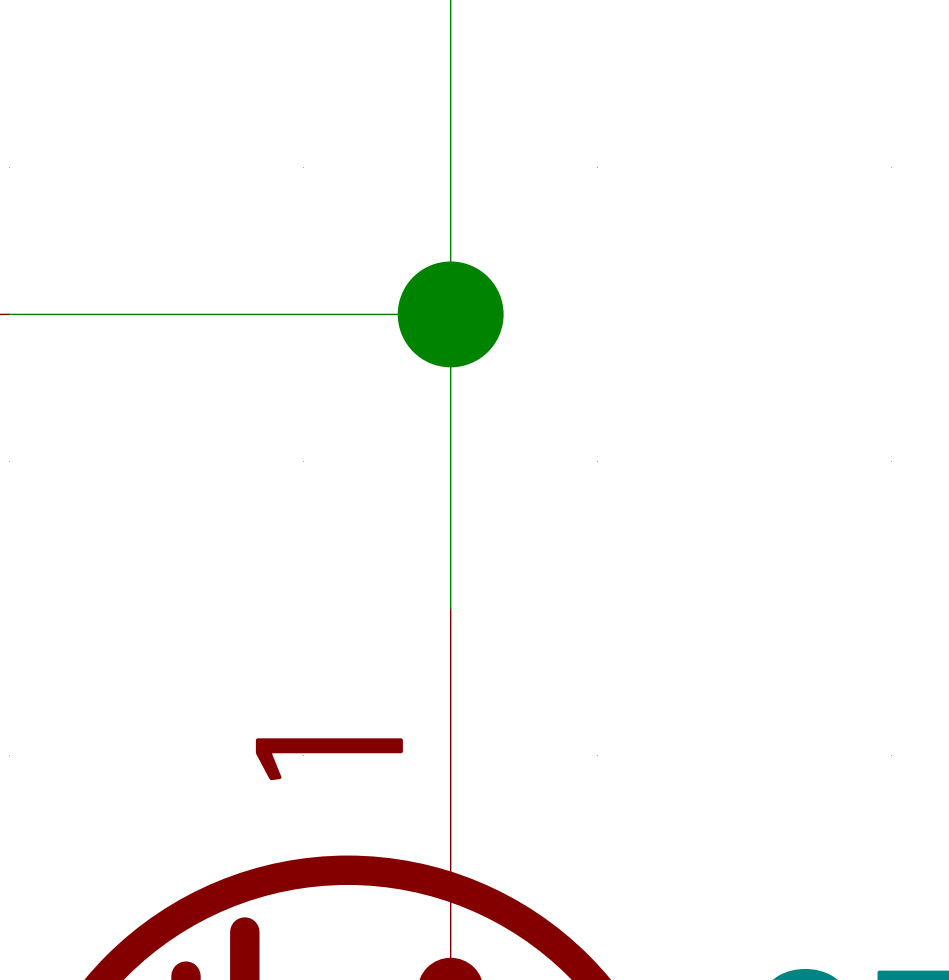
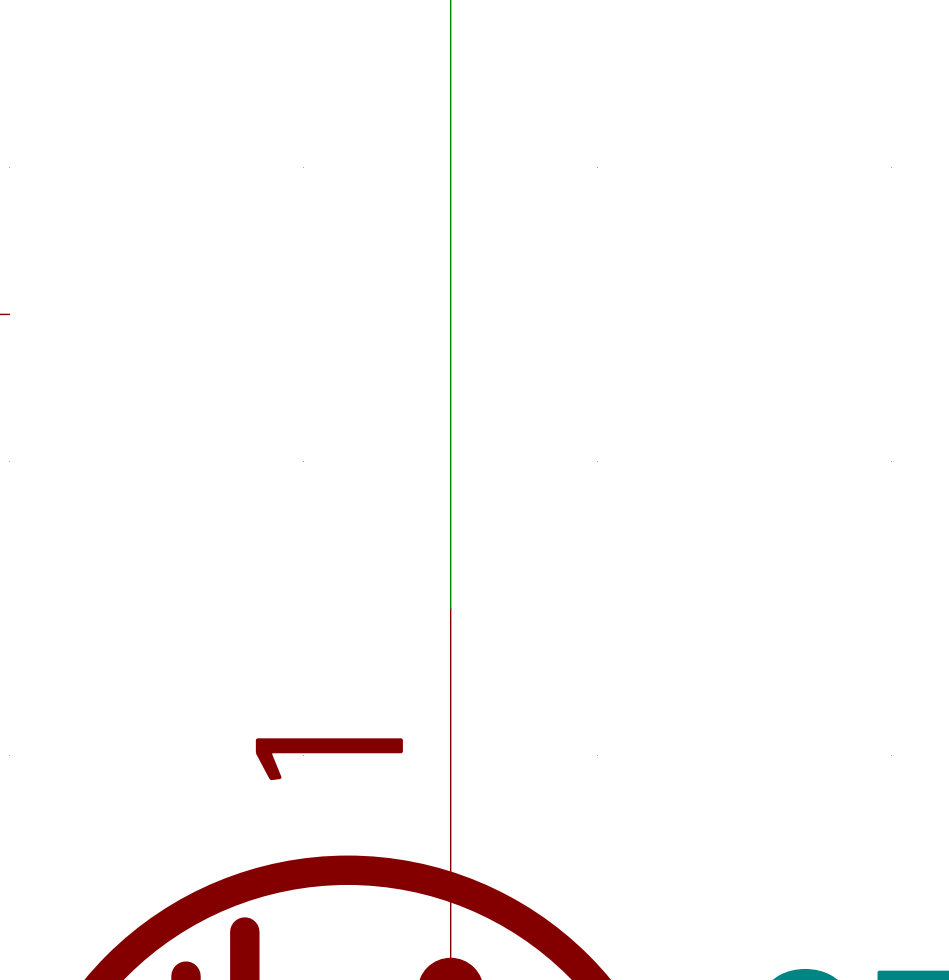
wire: (9, 314) (450, 314) -> none
junction: (450, 314) -> none

